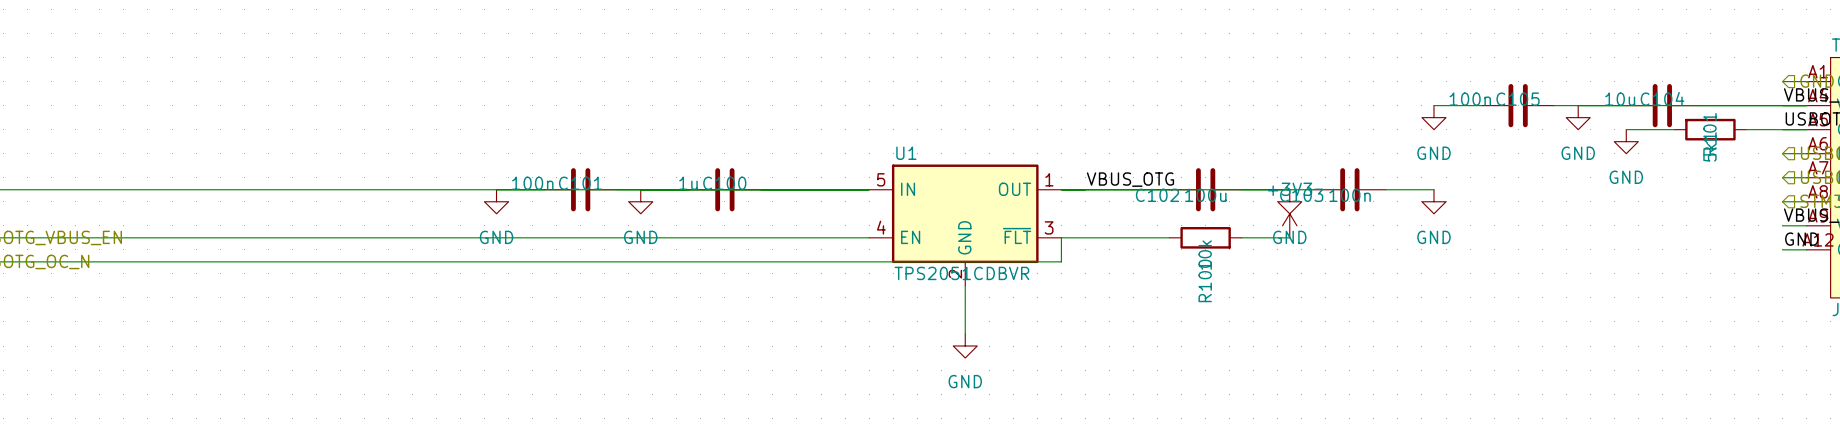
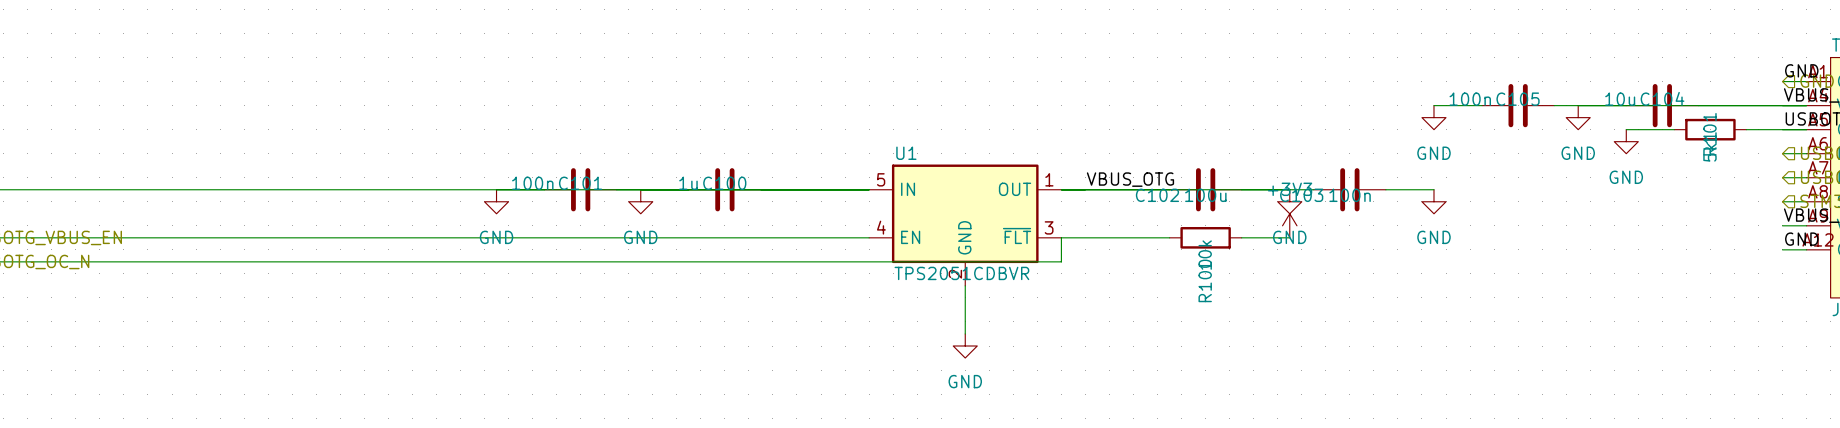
label: none -> GND (1801, 70)

